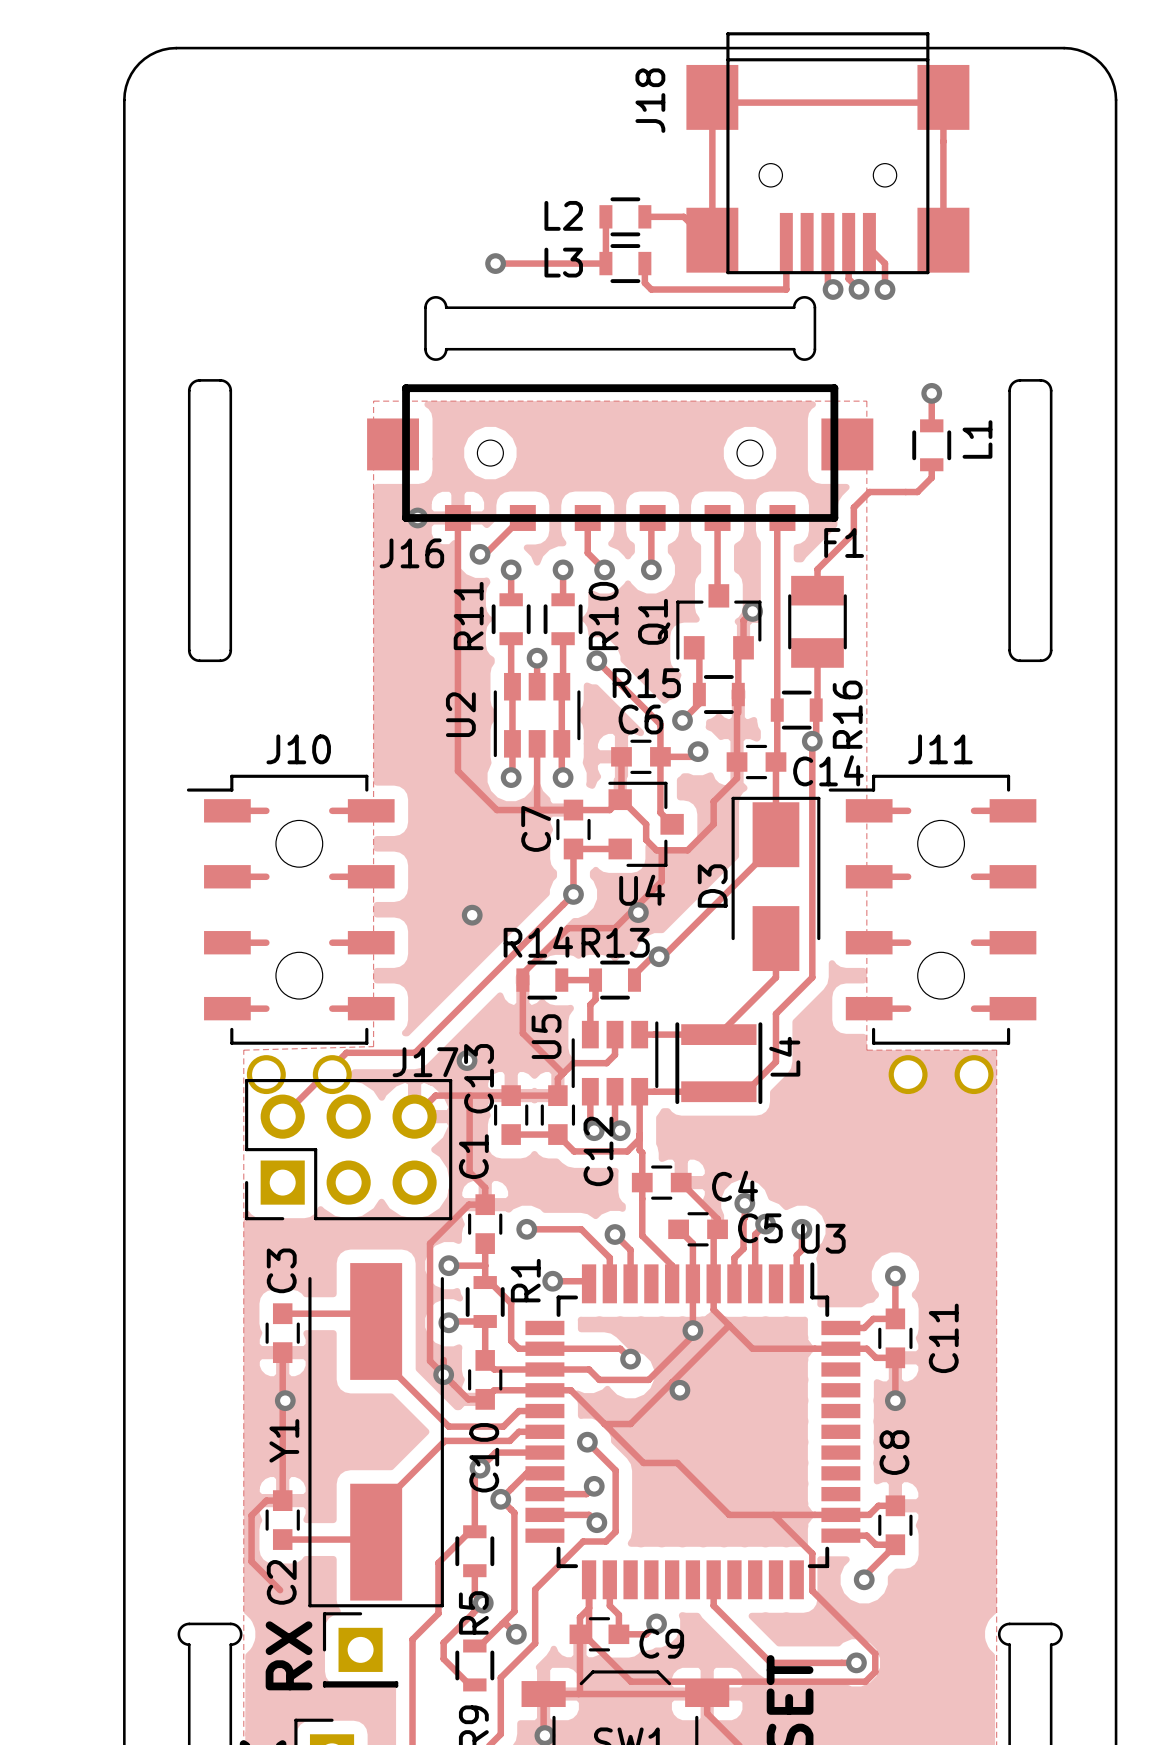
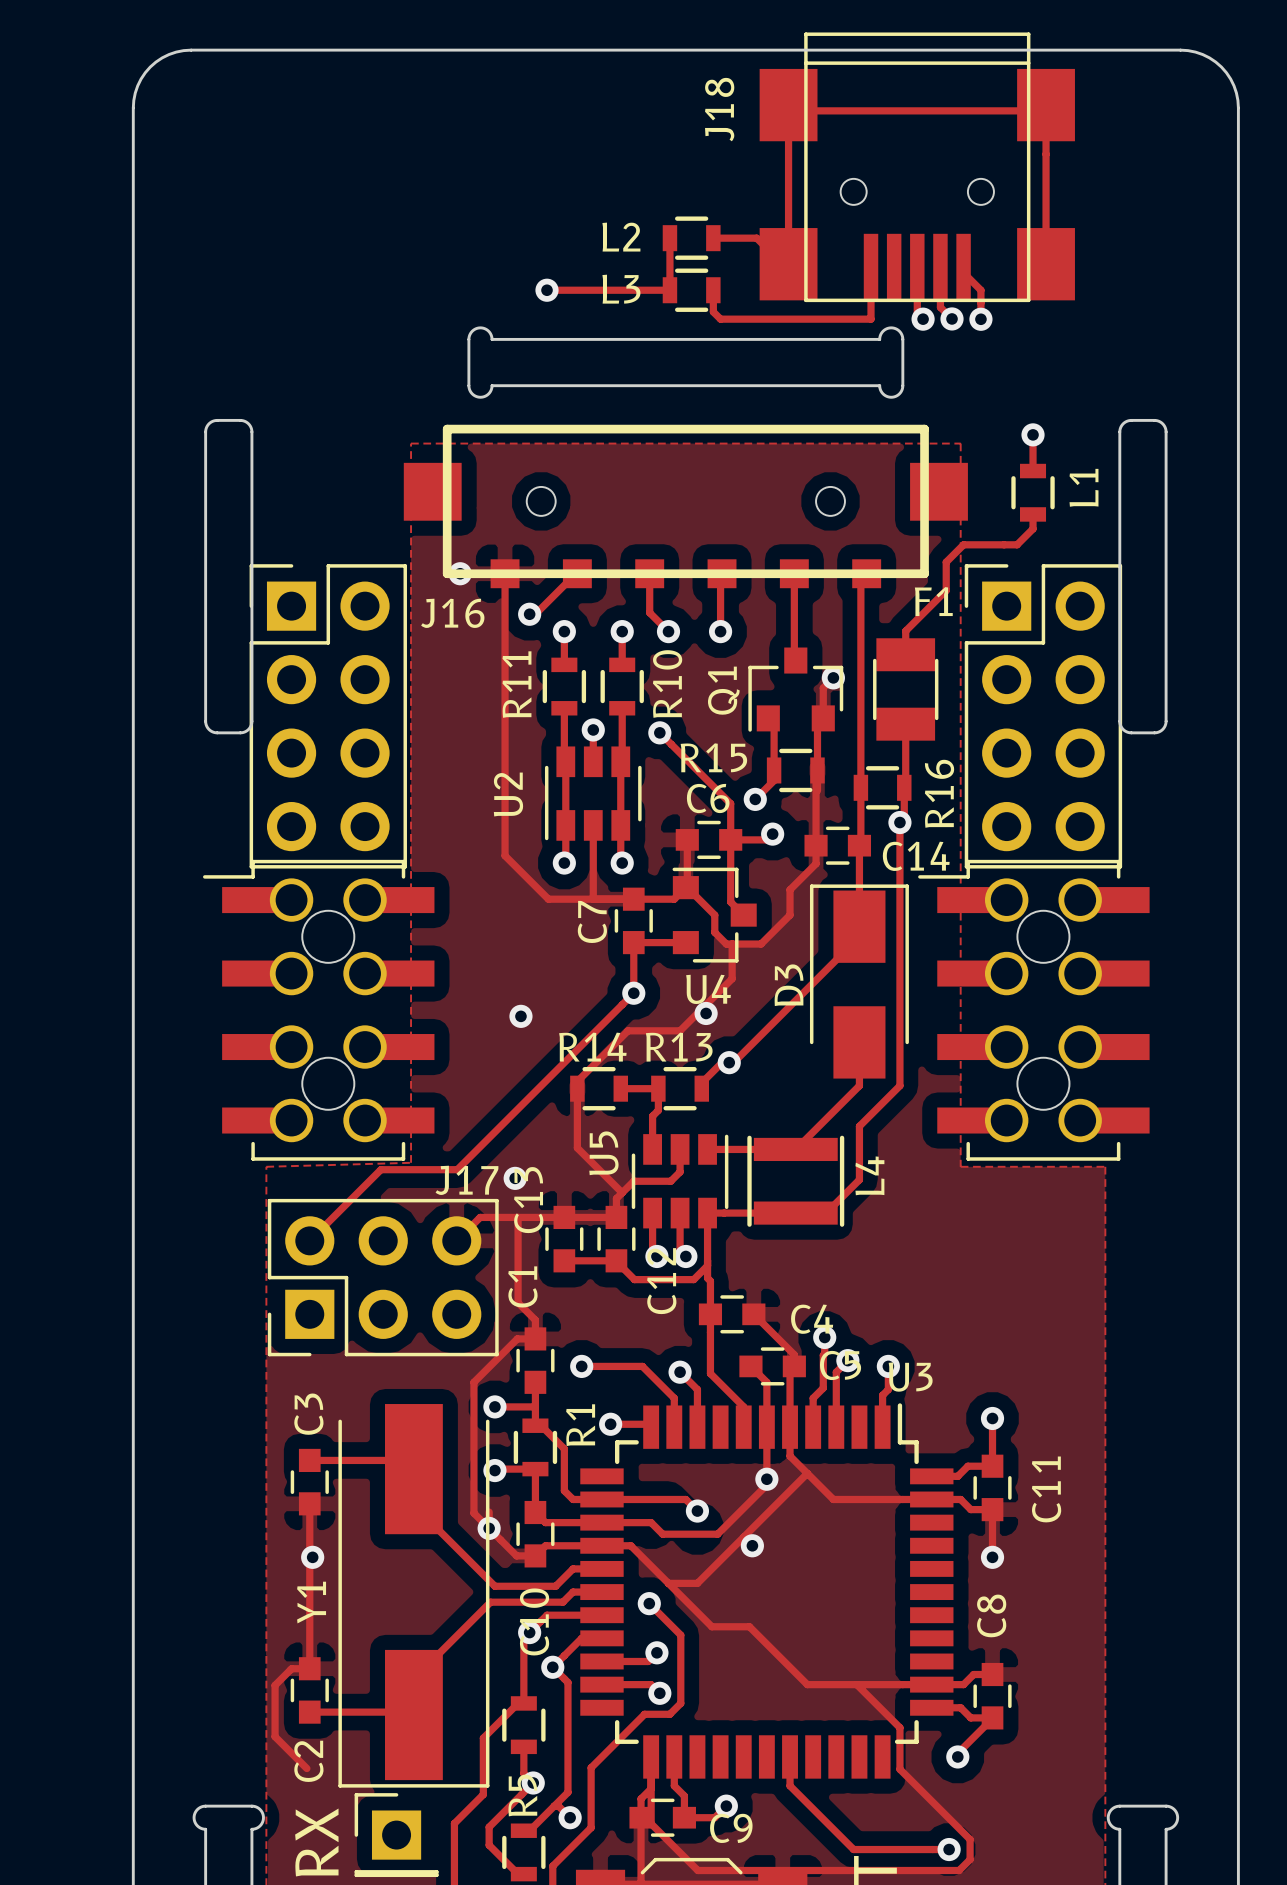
part: none -> (328, 716)
part: none -> (1043, 716)
part: none -> (318, 1010)
part: none -> (1033, 1010)
J10: (290, 934) -> none
J11: (932, 934) -> none

